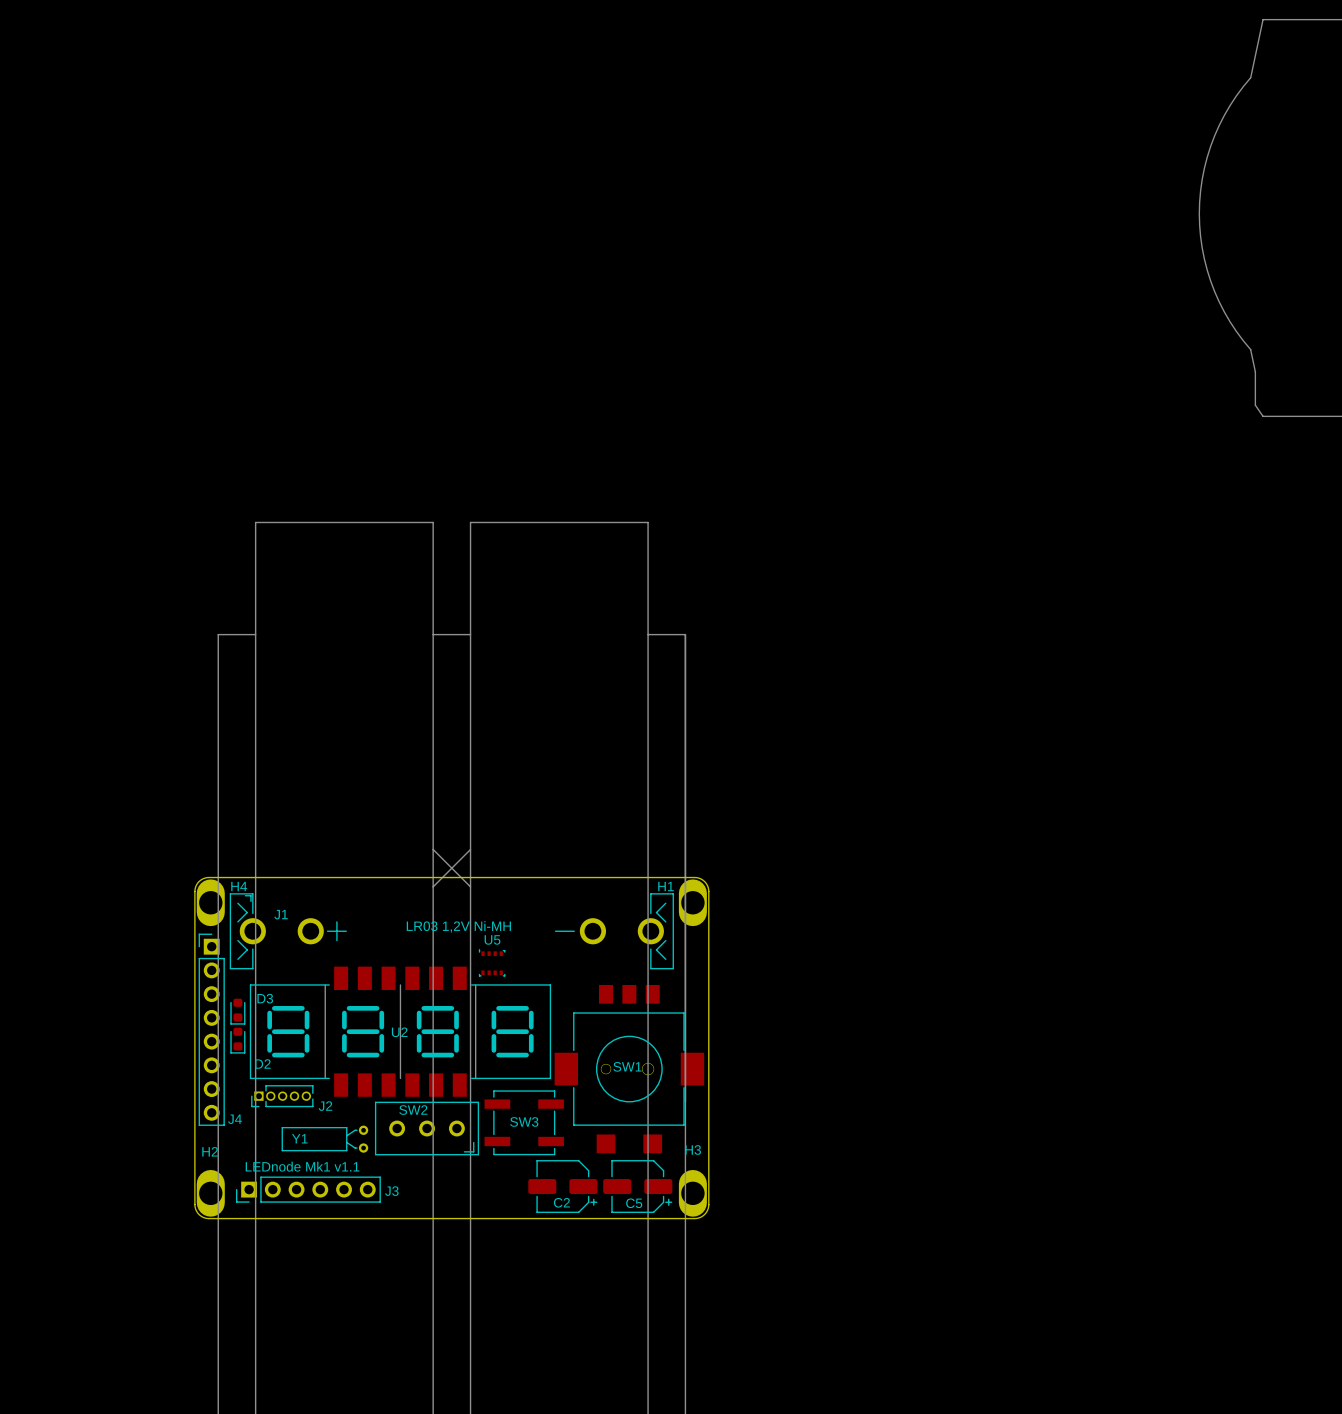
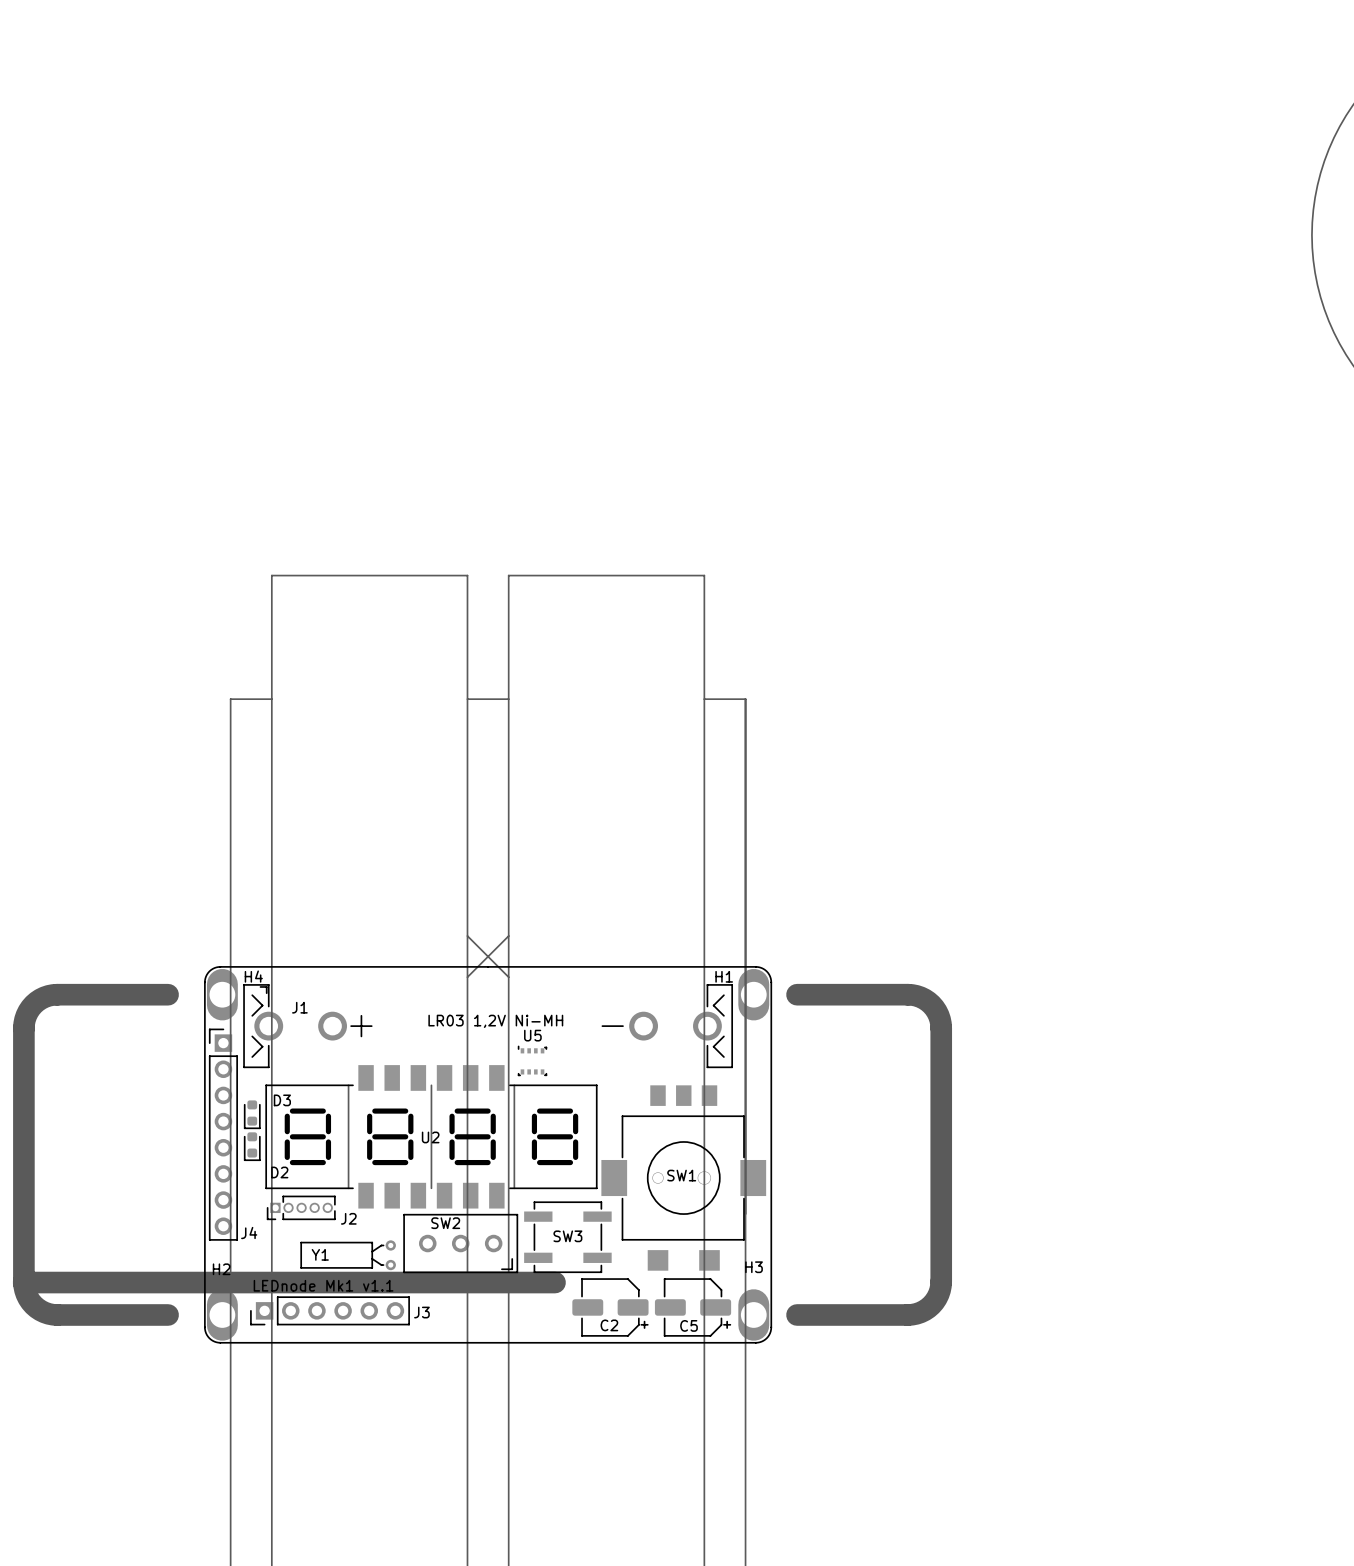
line: none -> (168, 994) (48, 995) (40, 999) (30, 1007) (25, 1019) (23, 1028) (23, 1281) (28, 1298) (40, 1310) (52, 1314) (168, 1314)
line: none -> (797, 994) (916, 995) (928, 1001) (934, 1007) (940, 1019) (941, 1028) (941, 1281) (936, 1298) (928, 1308) (912, 1314) (797, 1314)
line: none -> (23, 1282) (555, 1282)

